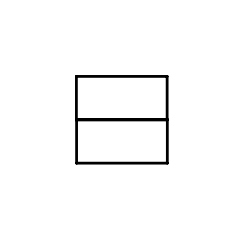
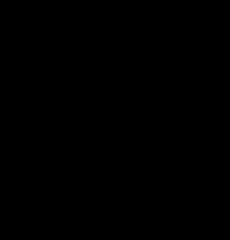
part: (121, 98) -> none
part: (121, 141) -> none

